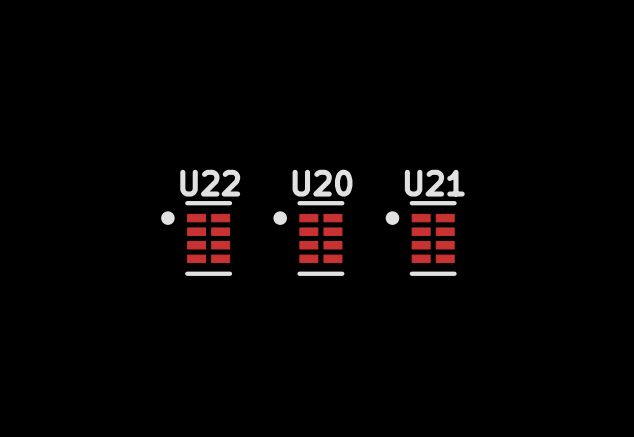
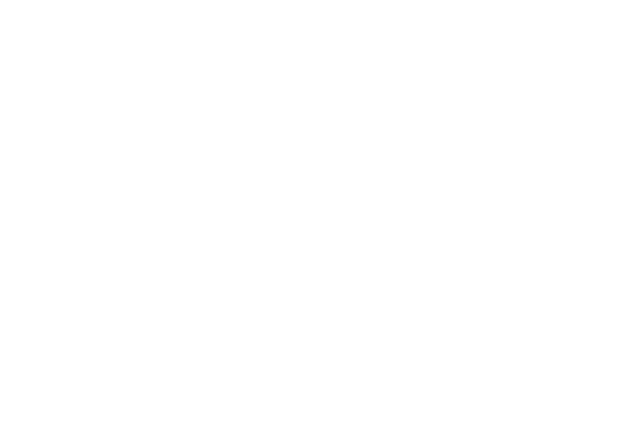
U22: (196, 238) -> none
U20: (308, 238) -> none
U21: (421, 238) -> none

